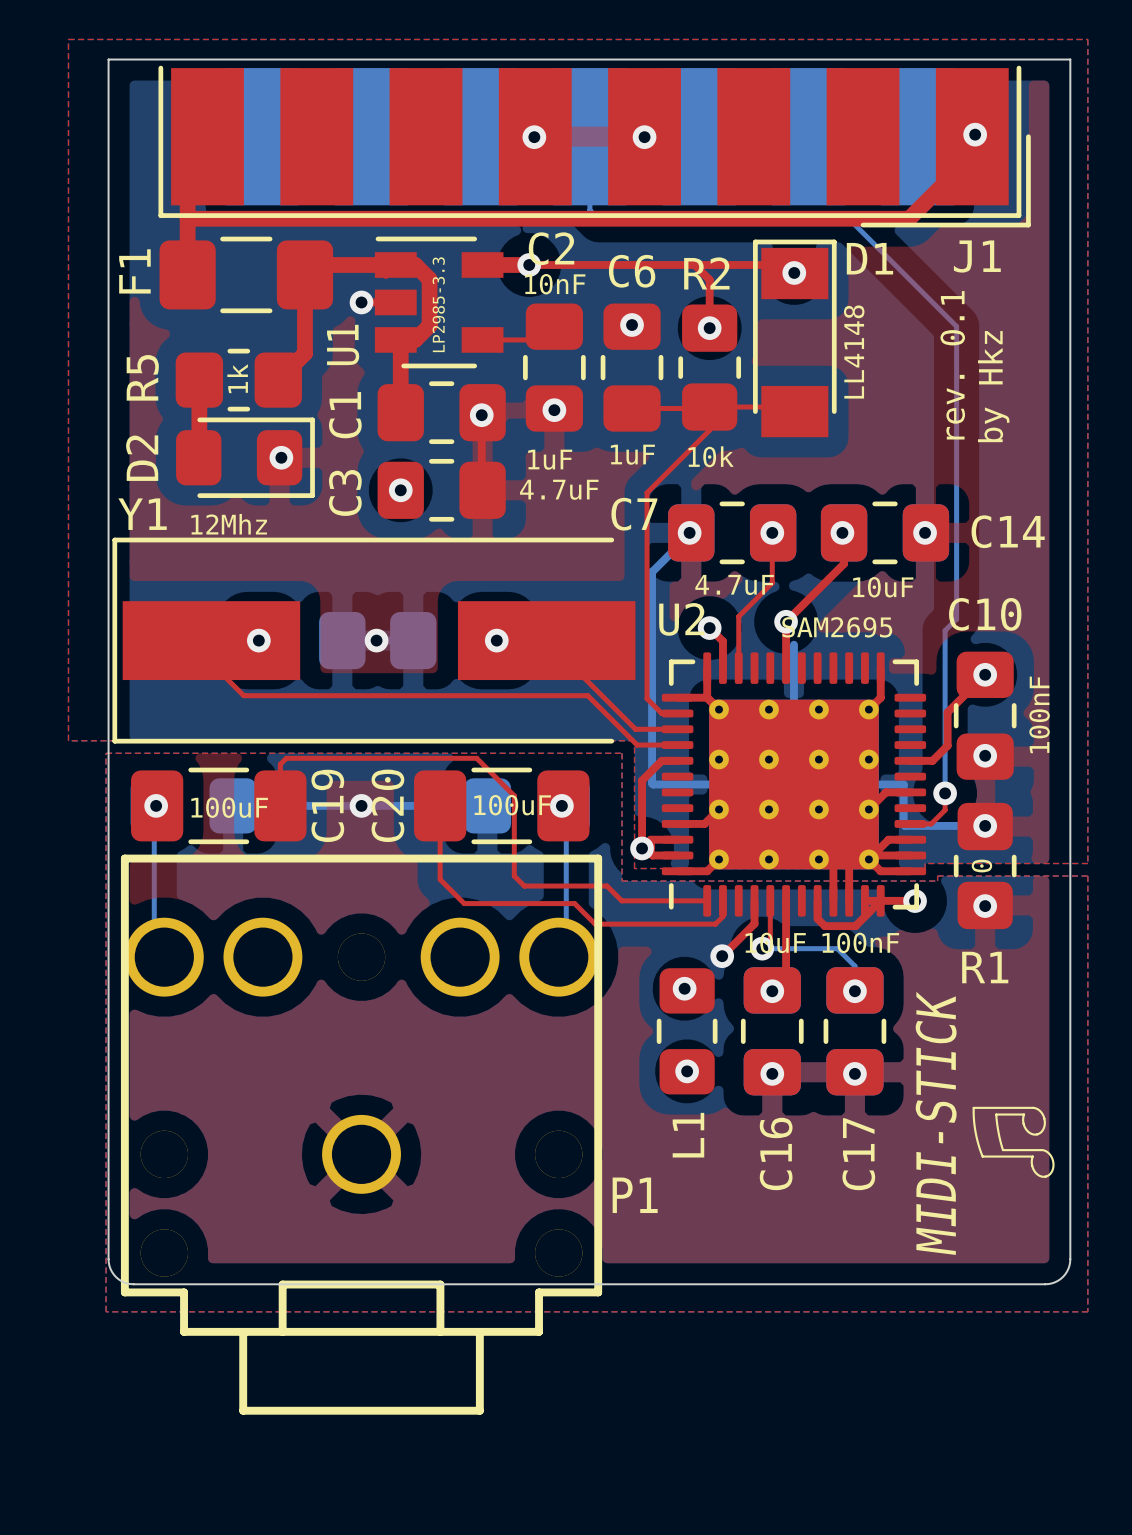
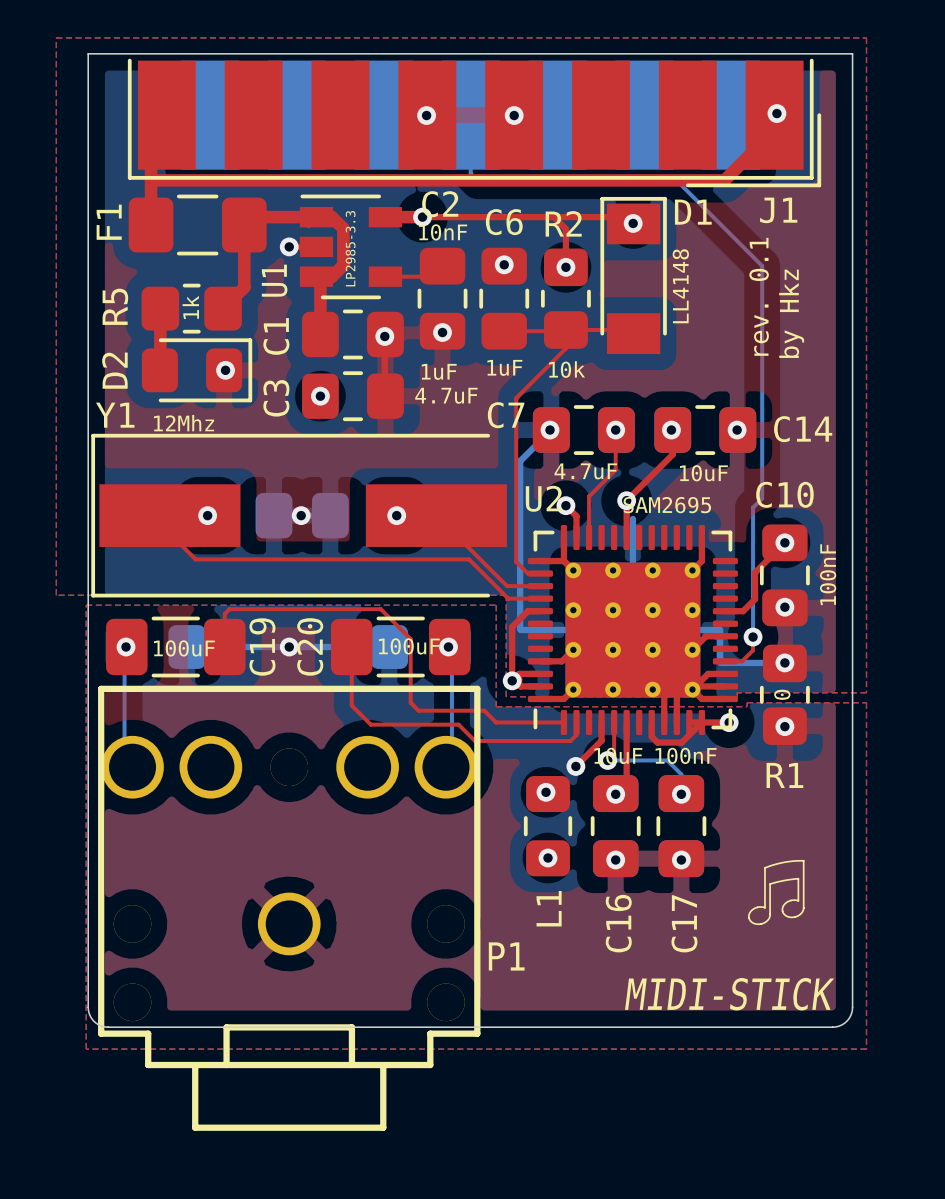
line: none -> (803, 860) (803, 907) (801, 912) (791, 917) (783, 912) (782, 907) (786, 902) (792, 900) (798, 900) (798, 878) (784, 880) (770, 884) (770, 915) (768, 919) (759, 924) (751, 921) (748, 916) (751, 910) (757, 907) (764, 907) (764, 867) (785, 862) (803, 860)
line: (973, 1107) (1033, 1107) (1039, 1110) (1043, 1115) (1044, 1122) (1043, 1129) (1039, 1133) (1032, 1134) (1026, 1129) (1023, 1122) (1024, 1114) (996, 1114) (998, 1131) (1003, 1150) (1042, 1150) (1048, 1152) (1053, 1163) (1050, 1173) (1043, 1176) (1036, 1173) (1032, 1165) (1032, 1156) (982, 1156) (975, 1131) (973, 1107) -> none
text rotation: 0° (936, 1123) -> 90° clockwise (729, 994)

